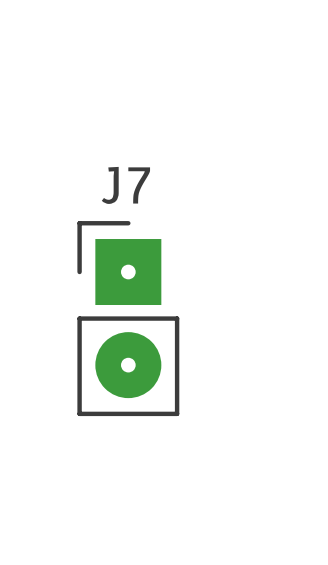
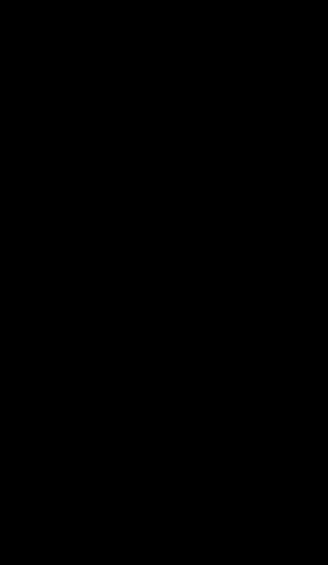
J7: (128, 318) -> none

